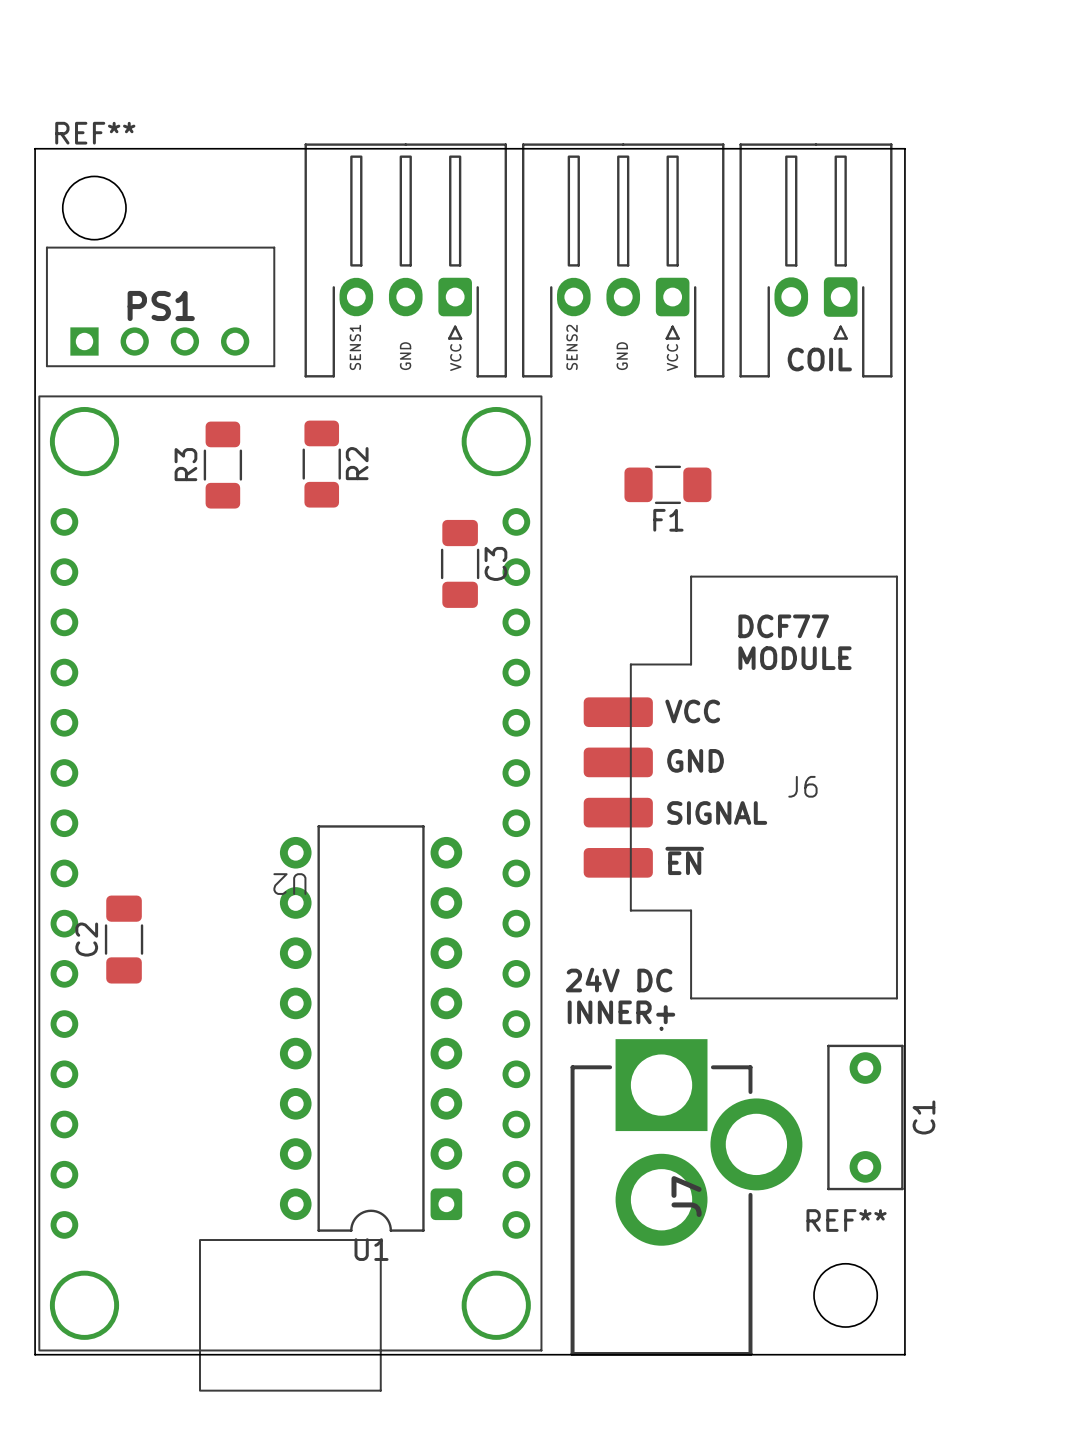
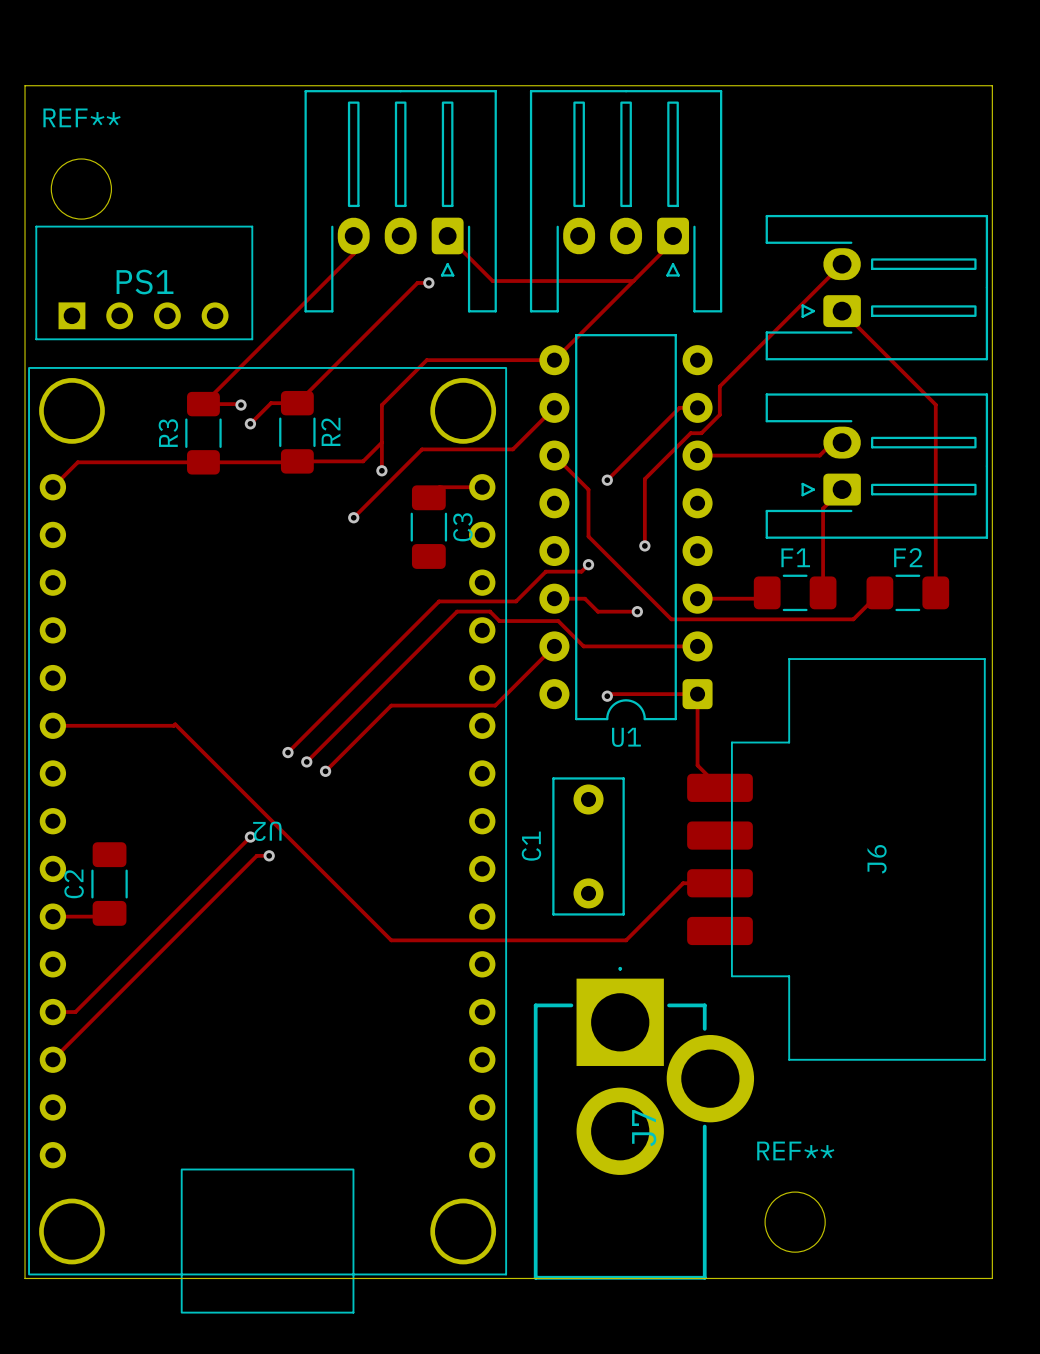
board edge: (35, 148) (904, 148) (904, 1354) -> (25, 132) (25, 85) (992, 85) (992, 1278) (851, 1278)
track: none -> (353, 235) (353, 253) (203, 404) (241, 405)
track: none -> (447, 235) (492, 281) (633, 281)
track: none -> (673, 235) (673, 241) (554, 360) (426, 360) (381, 405) (381, 470)
part position: (405, 260) -> (400, 201)
part position: (623, 260) -> (626, 201)
part rotation: 0° (815, 260) -> 90° clockwise (876, 287)
track: none -> (842, 264) (719, 386) (719, 414) (701, 433) (690, 433) (644, 479) (644, 545)
track: none -> (428, 282) (417, 282) (297, 403) (271, 403) (250, 423)
via: none -> (428, 282)
track: none -> (842, 311) (935, 404) (935, 592)
text: SENS1 (355, 347) -> none
text: SENS2 (572, 347) -> none
text: GND (405, 356) -> none
text: GND (622, 356) -> none
text: VCC (455, 357) -> none
text: VCC (672, 357) -> none
text: COIL (819, 359) -> none
via: none -> (241, 405)
track: none -> (554, 407) (512, 449) (422, 449) (353, 517)
track: none -> (697, 407) (679, 407) (607, 480)
via: none -> (250, 423)
track: none -> (381, 442) (363, 461) (77, 462) (52, 487)
track: none -> (842, 442) (832, 442) (819, 455) (697, 455)
F1 position: (667, 484) -> (795, 592)
track: none -> (554, 455) (588, 489) (588, 536) (671, 619) (853, 619) (879, 592)
part: none -> (876, 466)
via: none -> (381, 470)
via: none -> (607, 480)
F1 name position: F1 (668, 520) -> F1 (795, 557)
track: none -> (482, 487) (439, 487) (428, 497)
track: none -> (842, 489) (823, 508) (823, 592)
via: none -> (353, 517)
via: none -> (644, 545)
track: none -> (588, 564) (581, 571) (545, 571) (516, 601) (439, 601) (287, 752)
via: none -> (588, 564)
text: DCF77 (783, 626) -> none
track: none -> (767, 592) (761, 598) (697, 598)
F2: none -> (907, 592)
track: none -> (554, 598) (584, 598) (597, 611) (637, 611)
via: none -> (637, 611)
text: MODULE (795, 658) -> none
track: none -> (554, 646) (495, 705) (391, 705) (325, 771)
track: none -> (697, 646) (583, 646) (558, 621) (499, 621) (490, 611) (457, 611) (306, 761)
text: VCC (692, 711) -> none
track: none -> (607, 696) (609, 694) (697, 694) (697, 765) (720, 787)
via: none -> (607, 696)
text: GND (695, 760) -> none
track: none -> (52, 725) (175, 724) (391, 940) (626, 940) (683, 883) (720, 883)
J6 name rotation: 0° (802, 786) -> 90° counterclockwise (877, 859)
J6 position: (740, 787) -> (836, 859)
via: none -> (287, 752)
via: none -> (306, 761)
text: SIGNAL (717, 812) -> none
via: none -> (325, 771)
text: ~{EN} (684, 860) -> none
track: none -> (250, 837) (75, 1012) (52, 1012)
via: none -> (250, 837)
track: none -> (269, 855) (256, 855) (52, 1059)
via: none -> (269, 855)
track: none -> (109, 913) (106, 916) (52, 916)
text: 24V DC (619, 980) -> none
text: INNER+ (621, 1012) -> none
U1 position: (371, 1028) -> (625, 527)
C1 position: (865, 1117) -> (588, 846)
C1 name position: C1 (923, 1117) -> C1 (531, 846)

